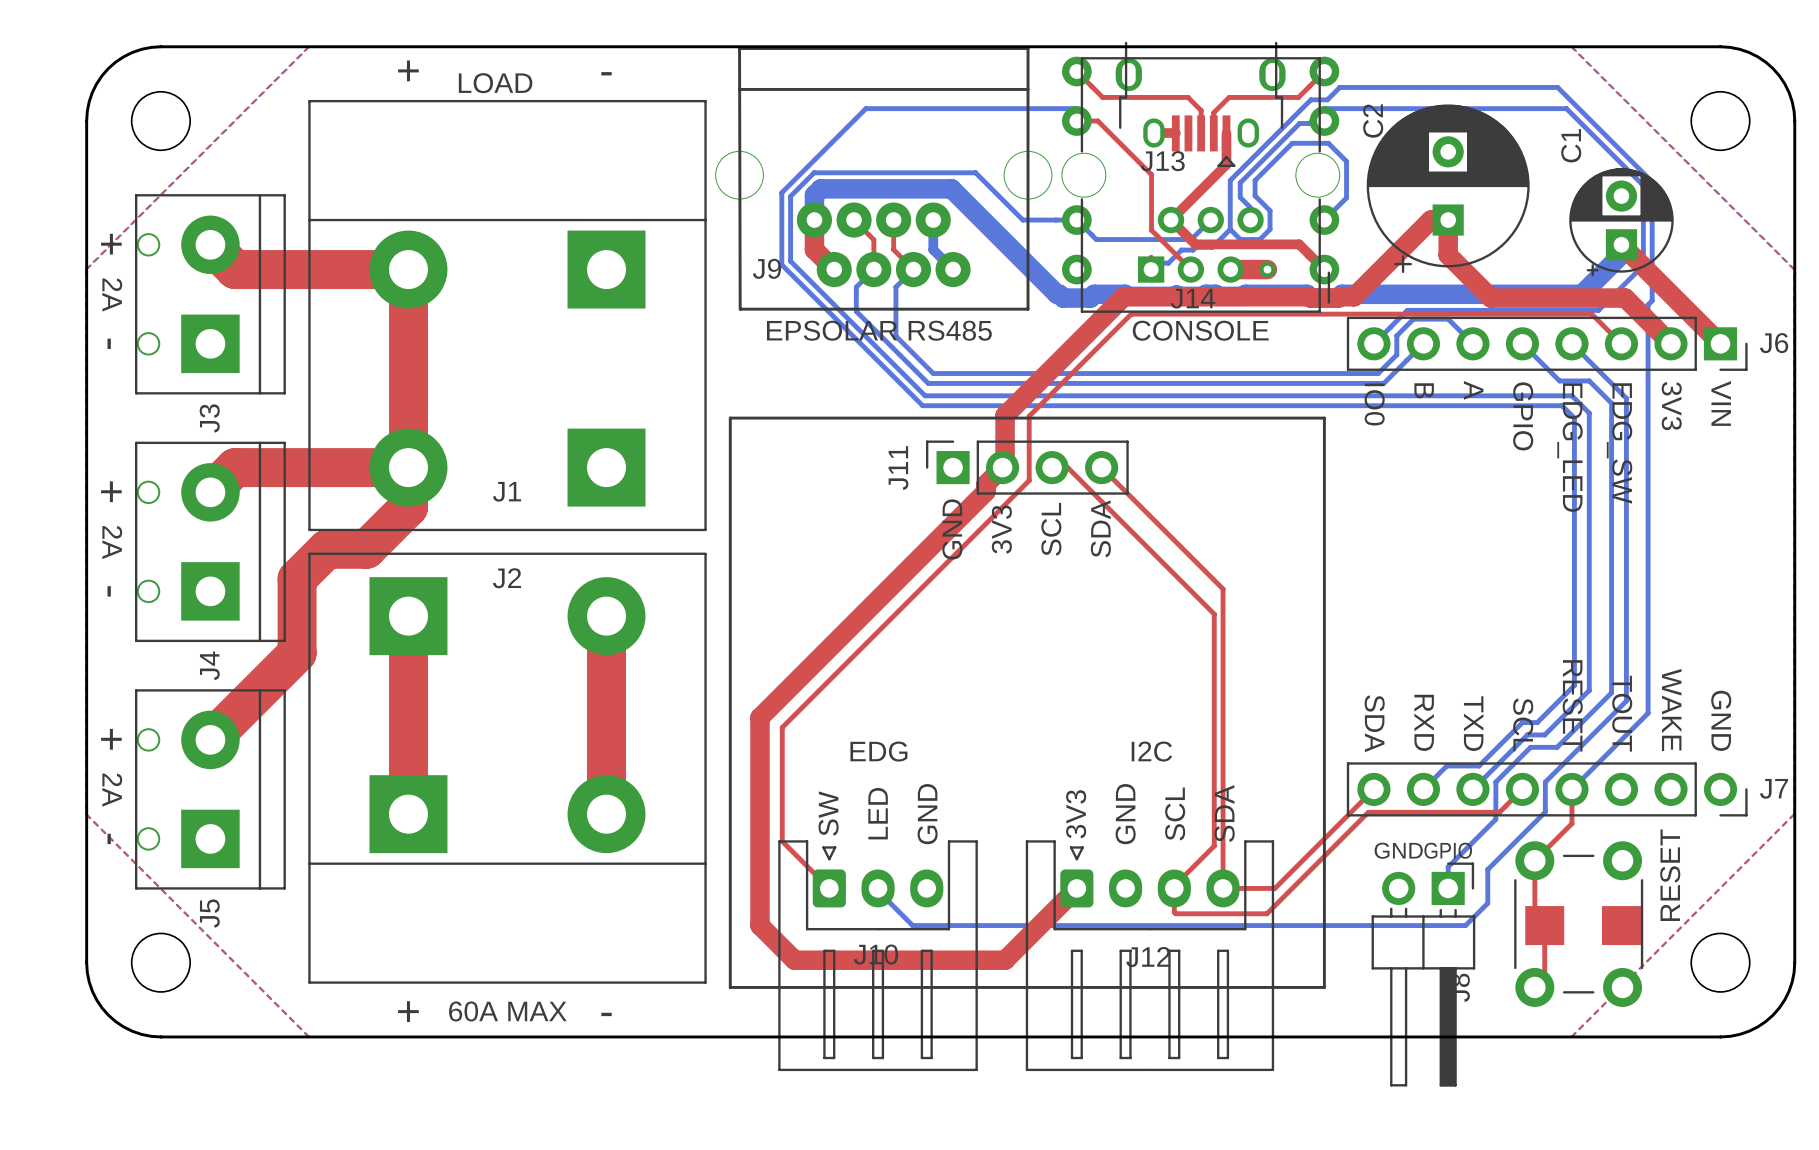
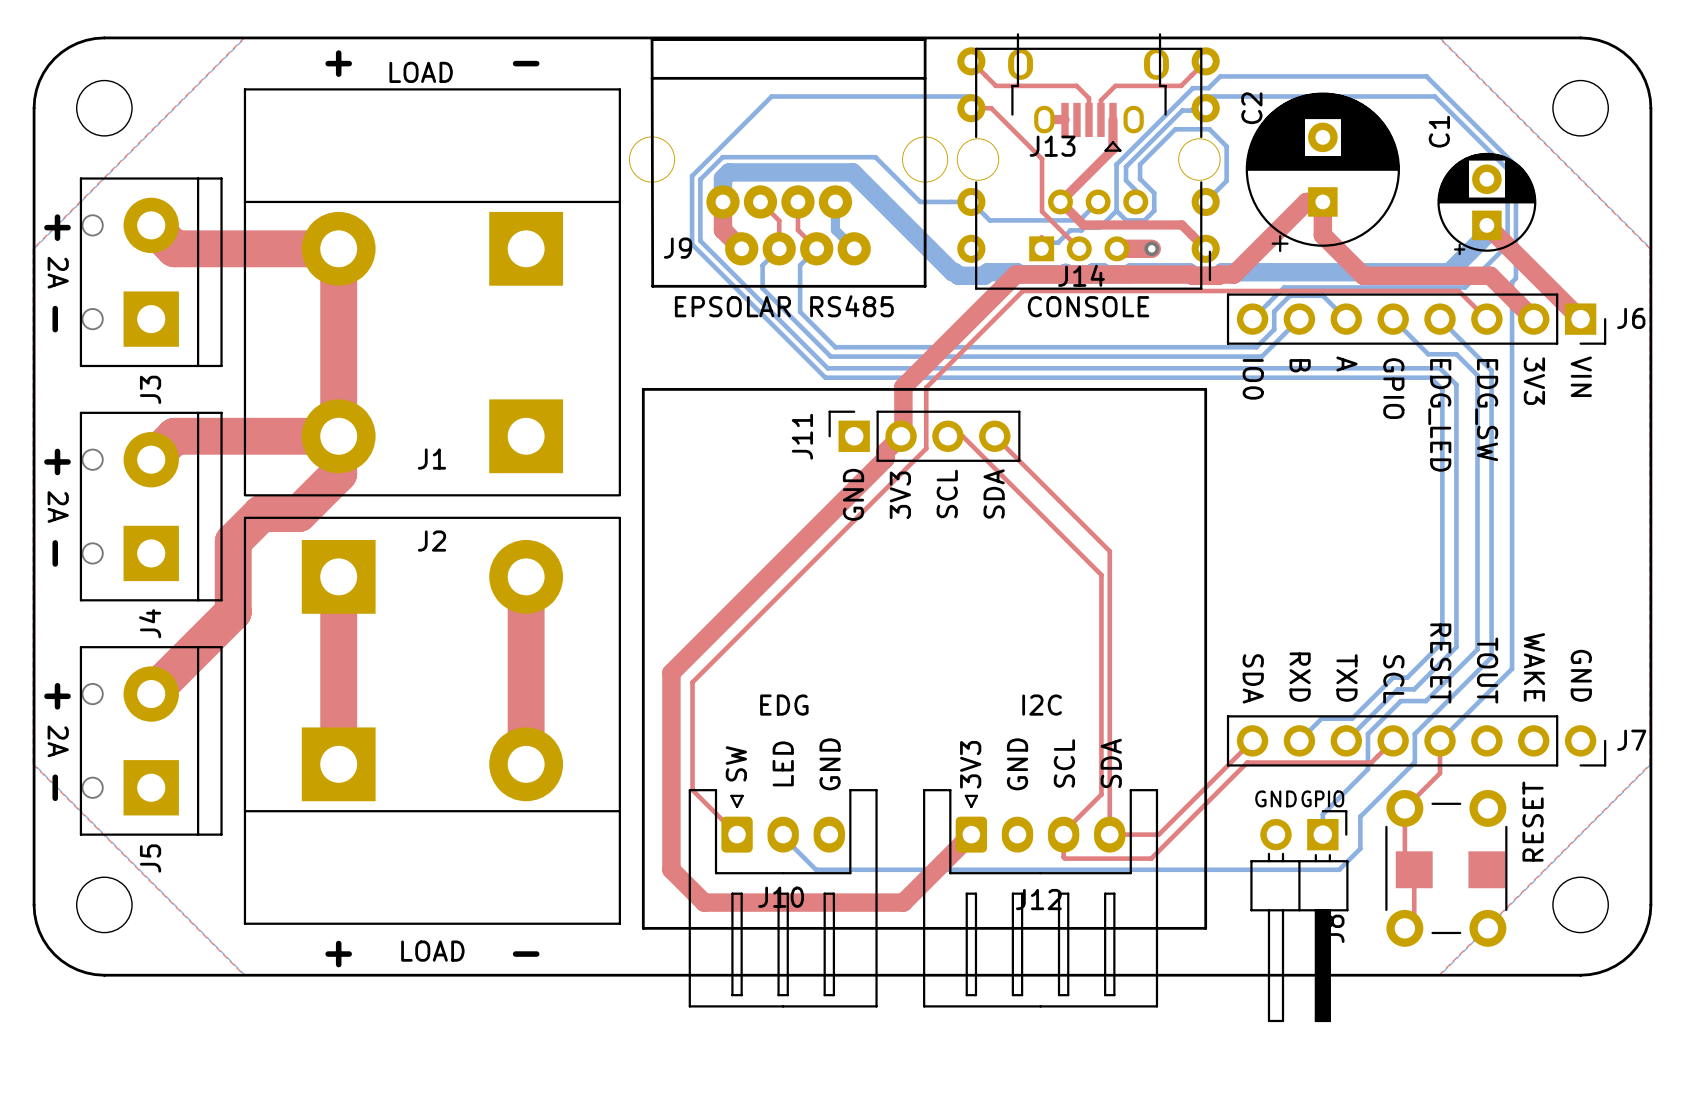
text: 60A MAX (507, 1011) -> LOAD (432, 951)

